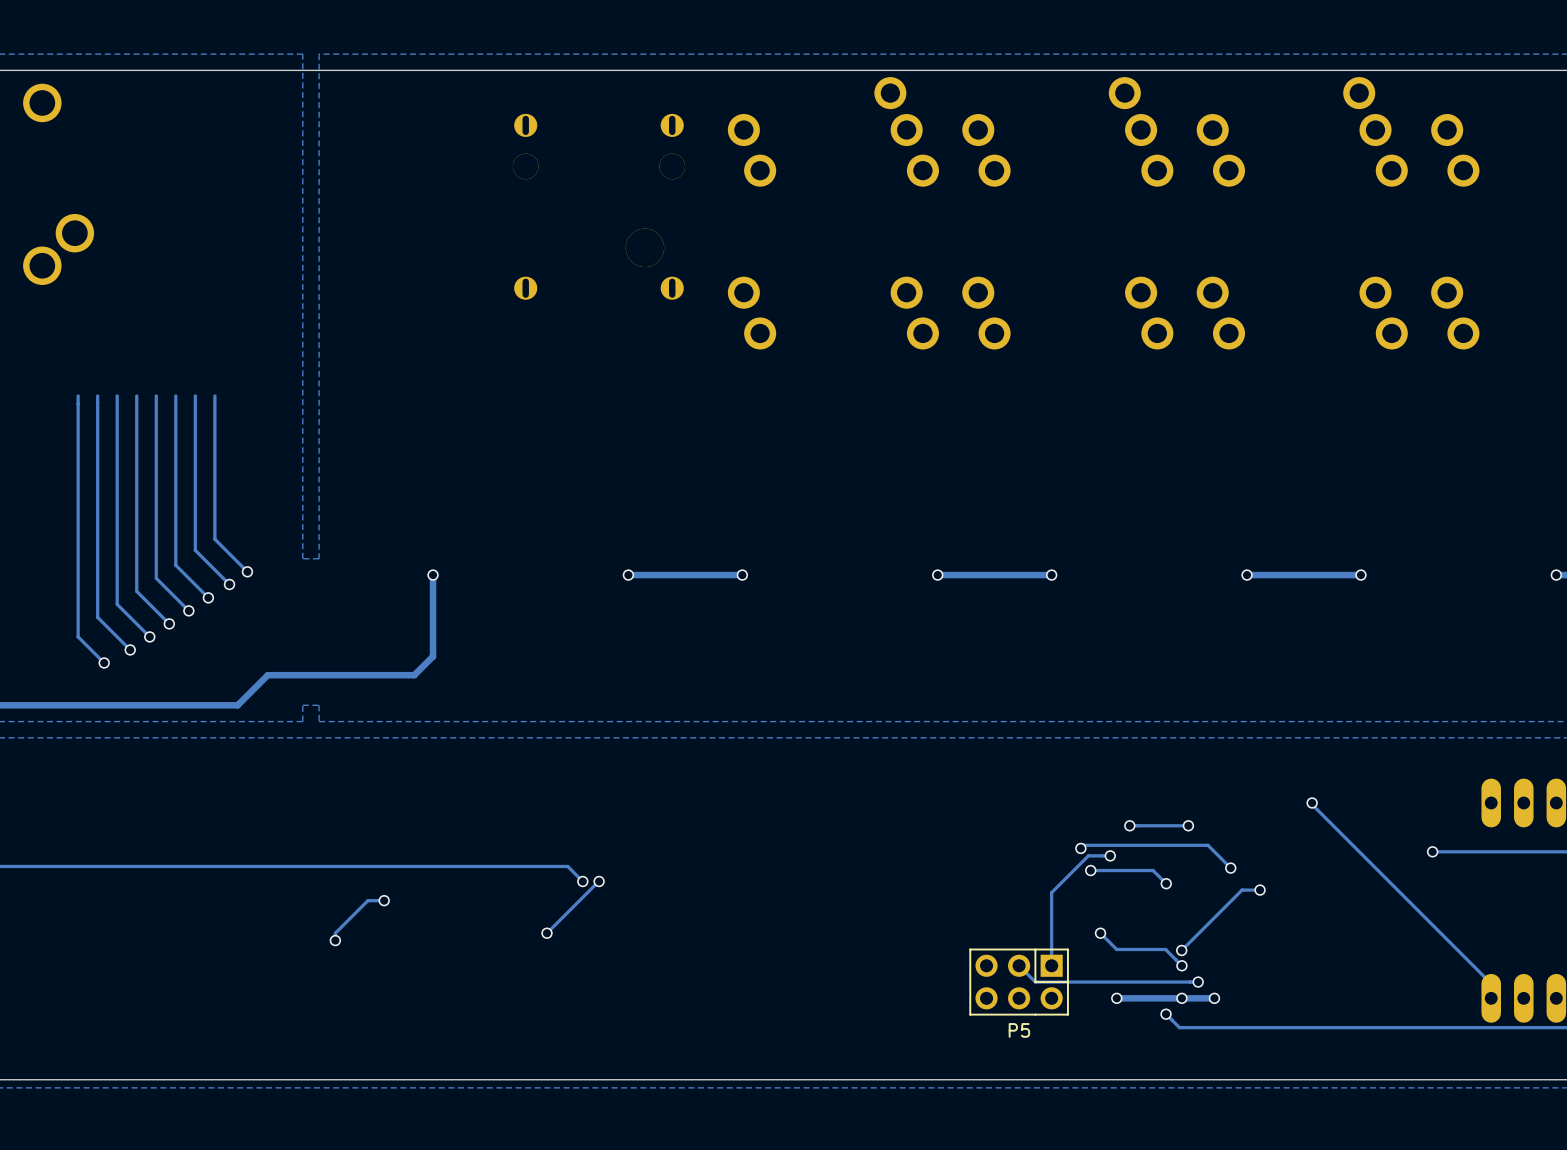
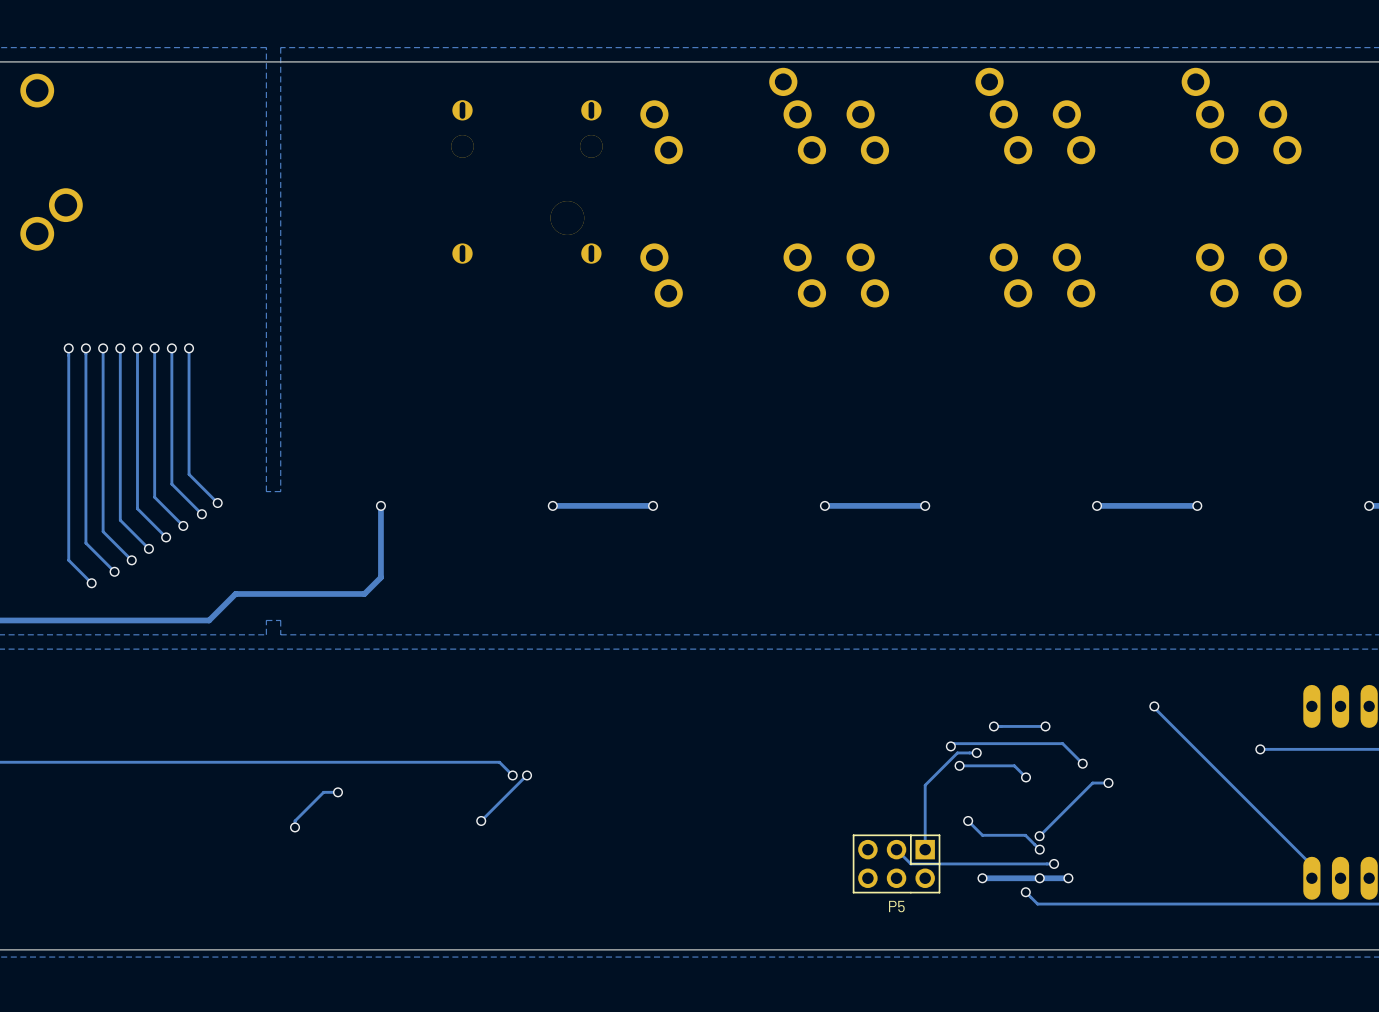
via: none -> (68, 348)
via: none -> (85, 348)
via: none -> (103, 348)
via: none -> (120, 348)
via: none -> (137, 348)
via: none -> (154, 348)
via: none -> (171, 348)
via: none -> (189, 348)

